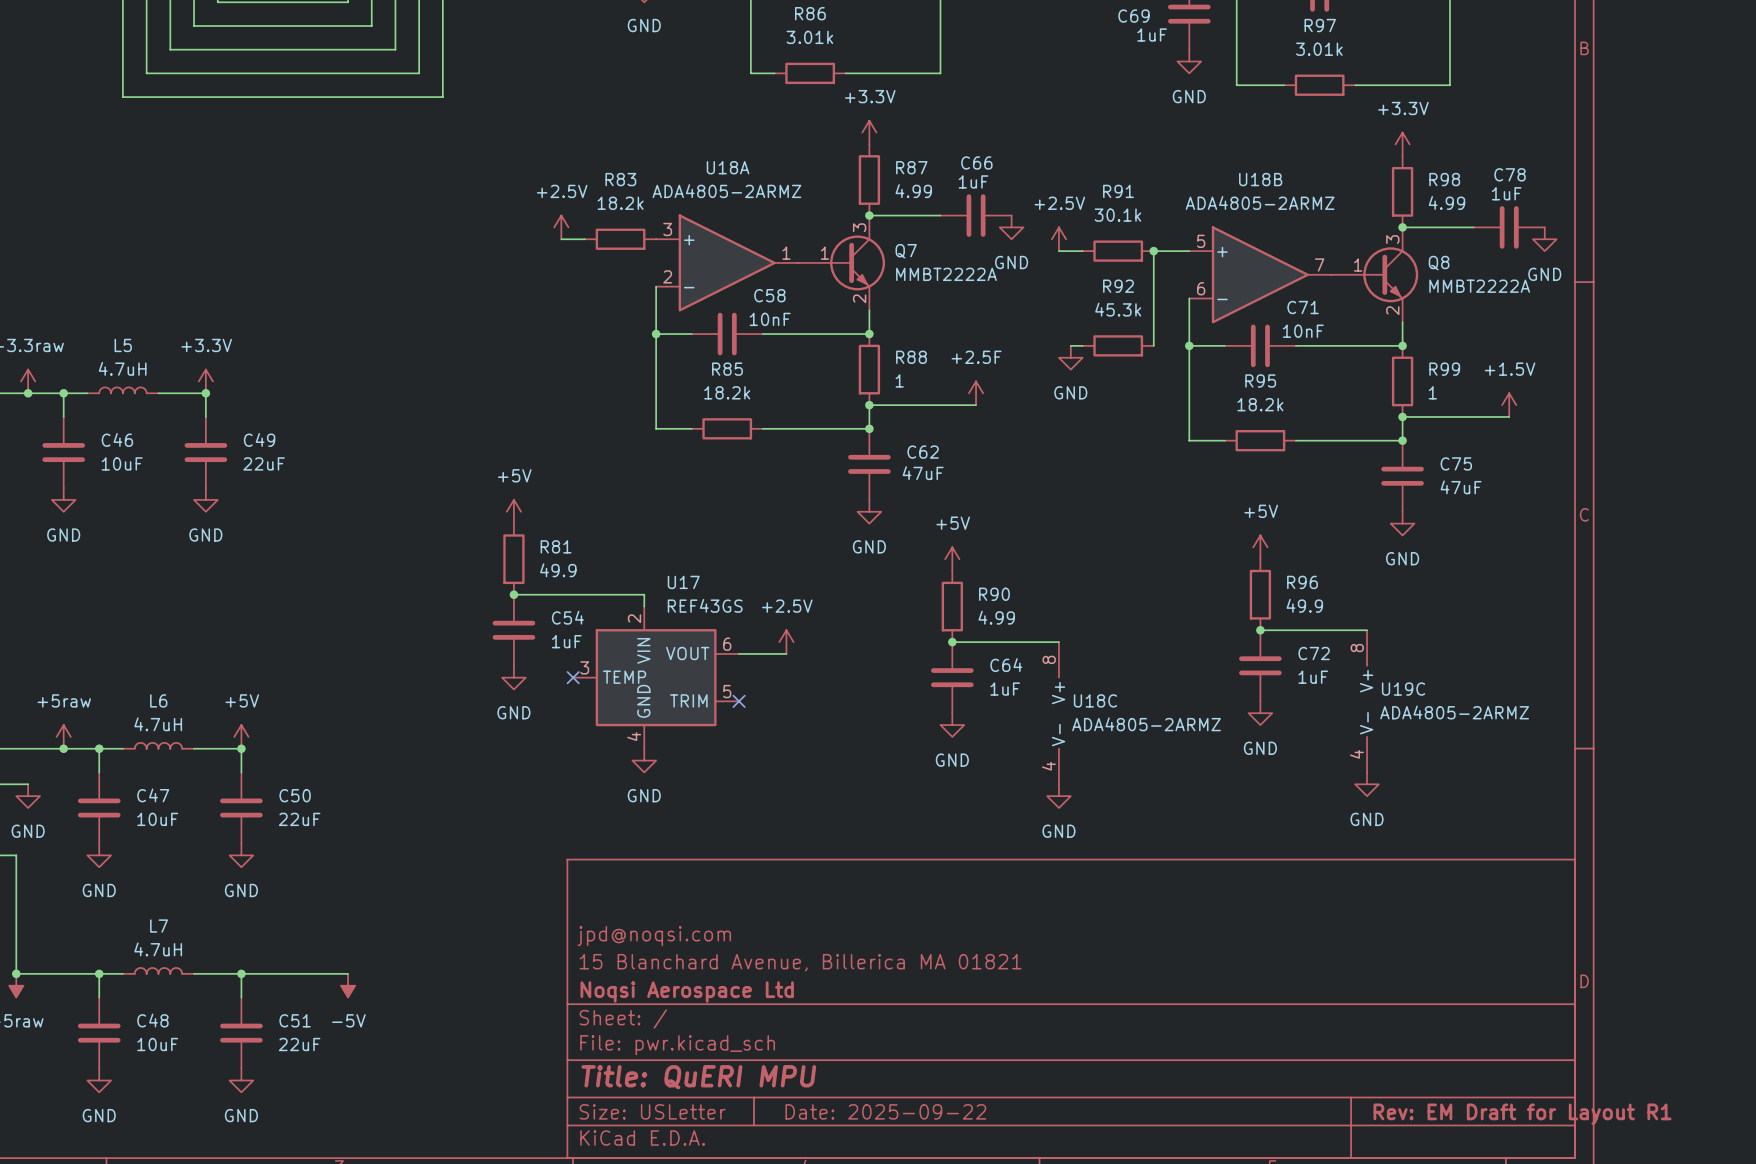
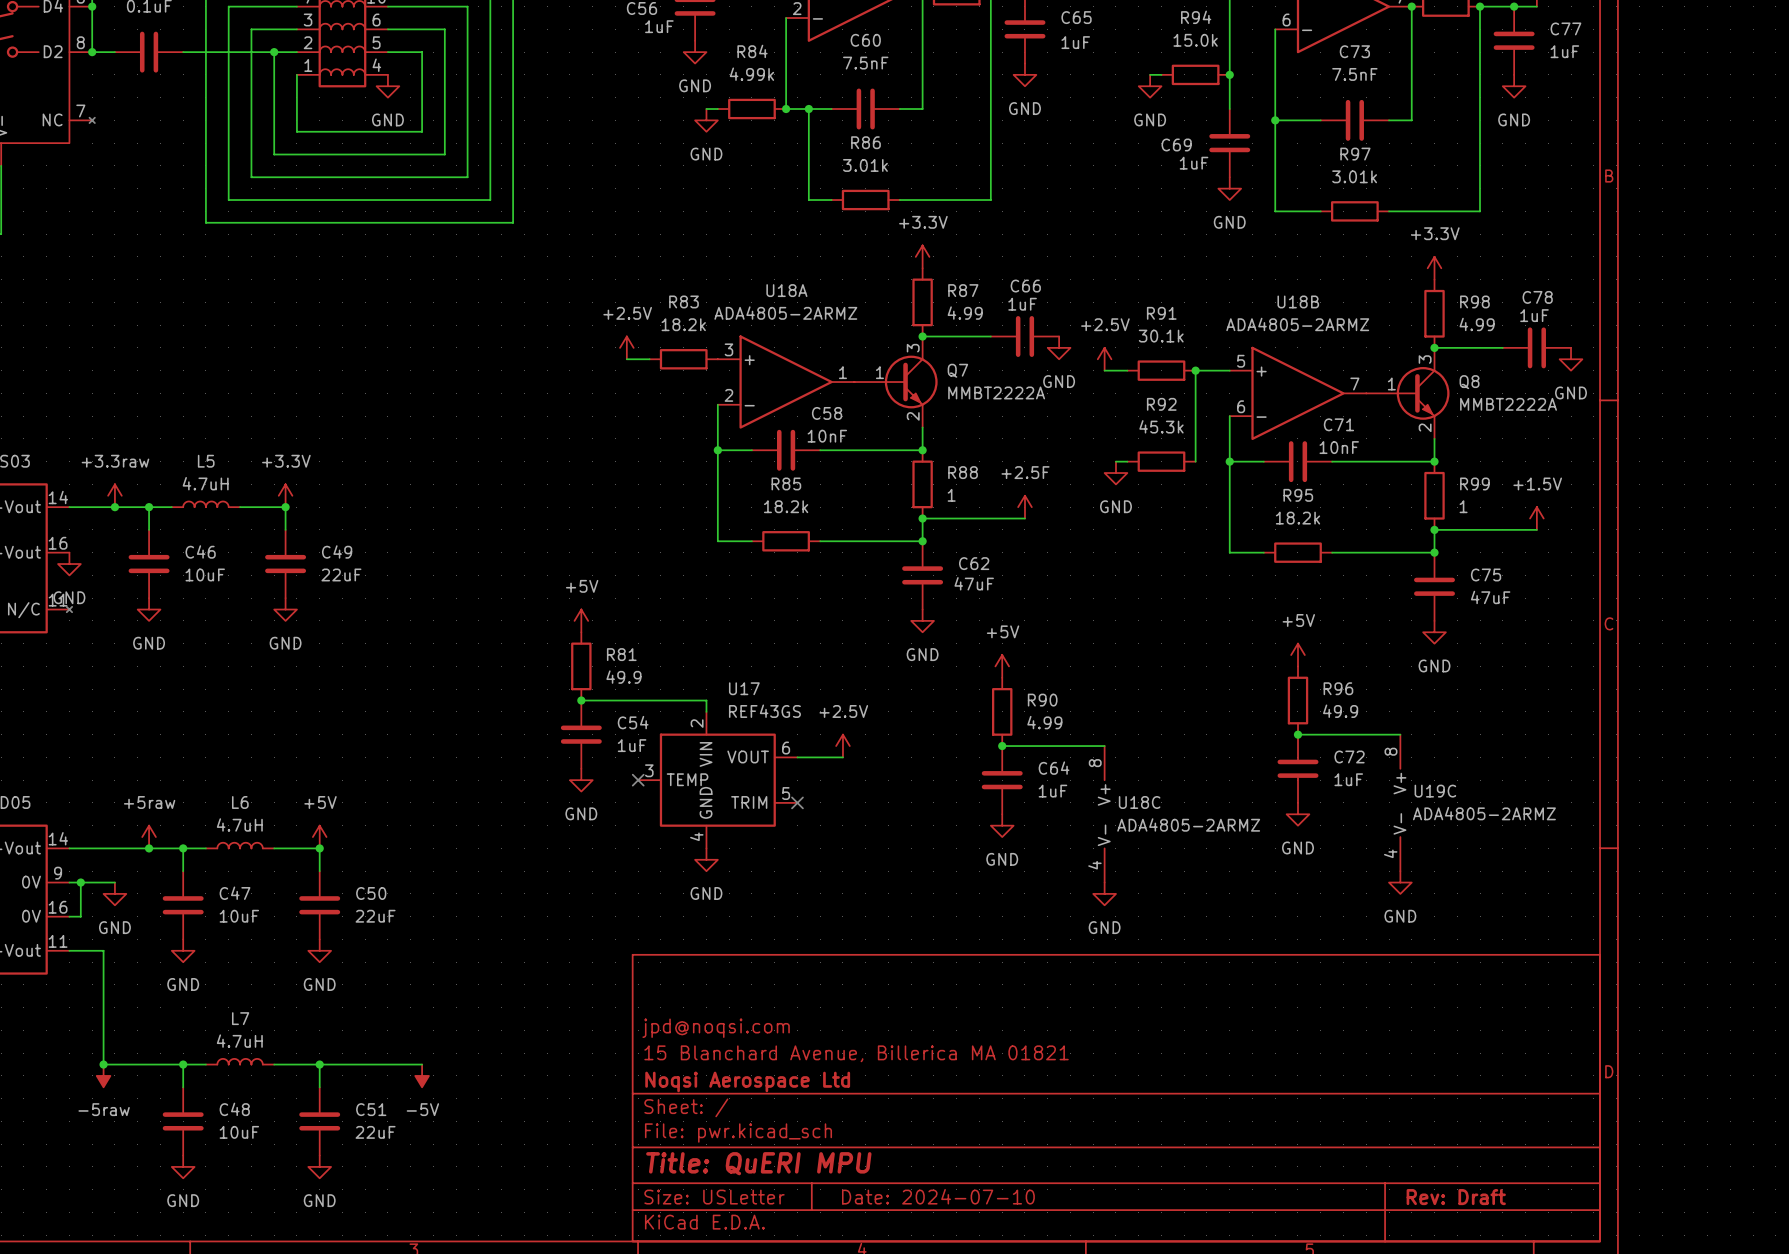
title block: Date: 2025-09-22 (885, 1111) -> Date: 2024-07-10 (938, 1196)
title block: Rev: EM Draft for Layout R1 (1522, 1114) -> Rev: Draft (1456, 1197)

